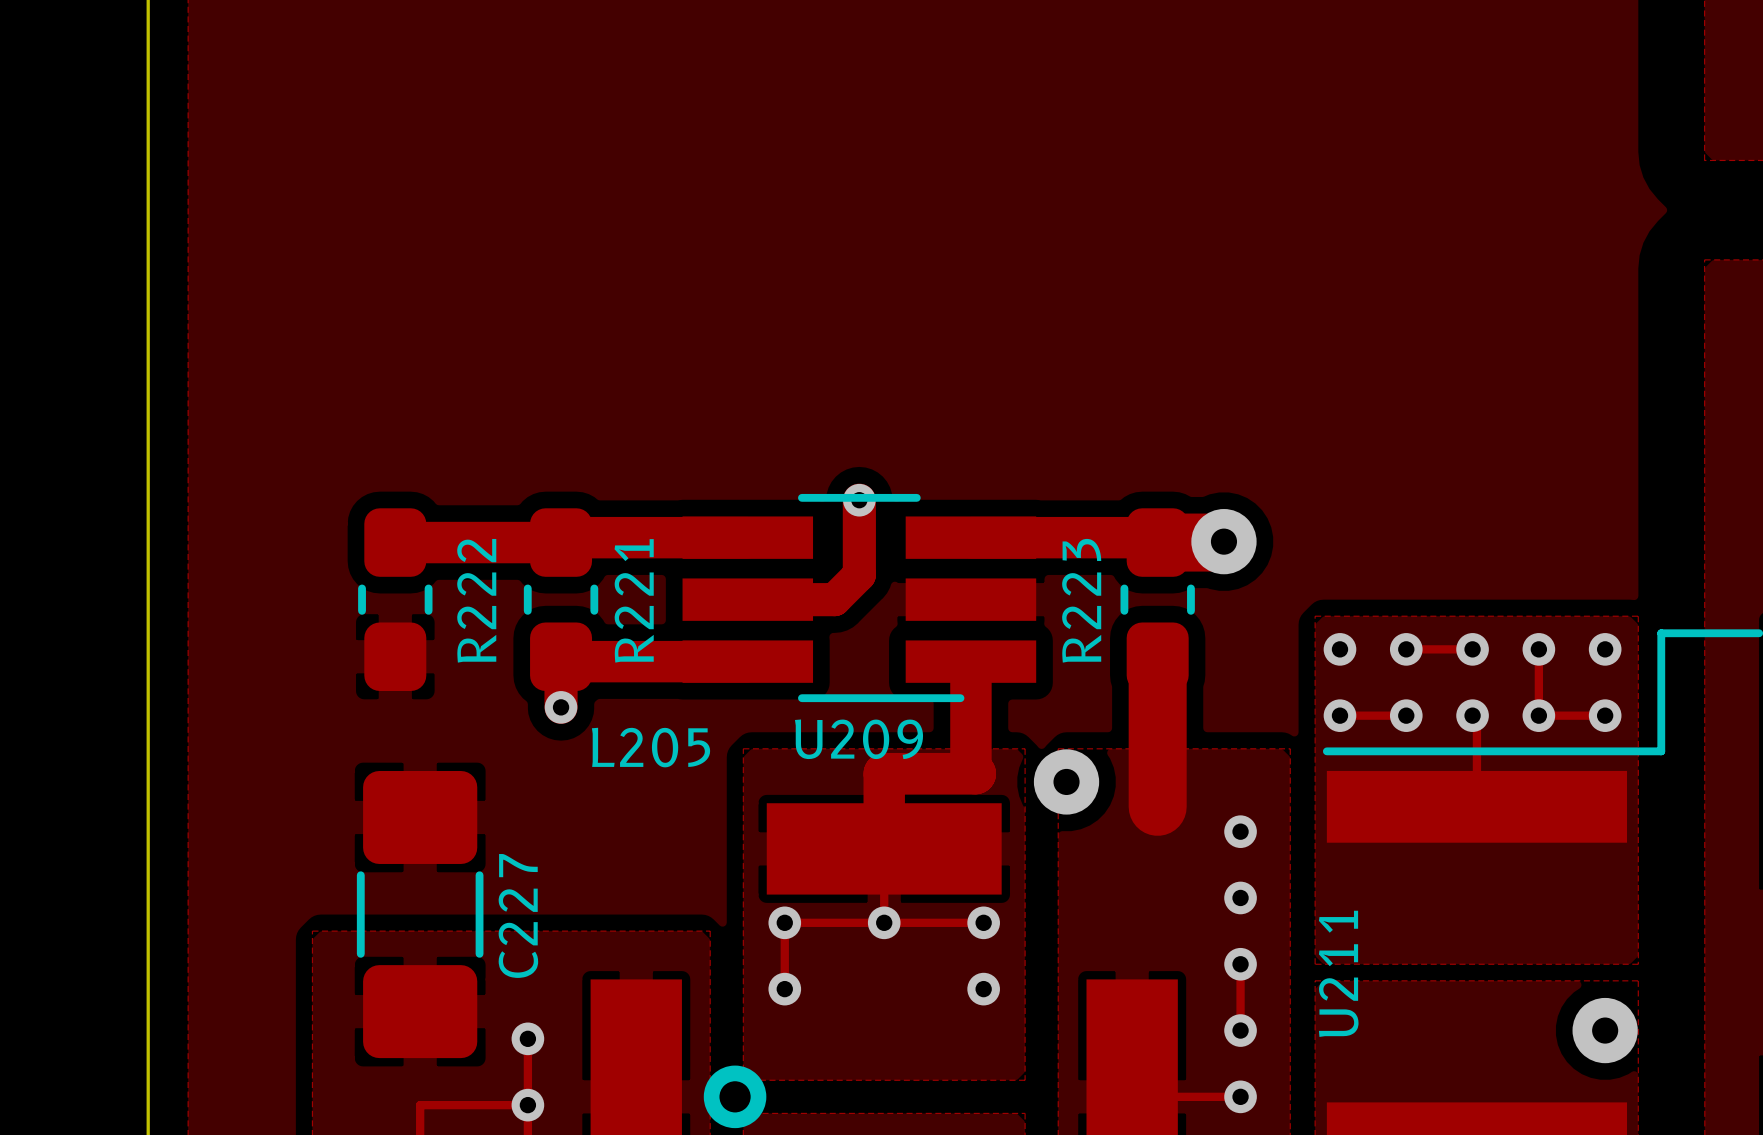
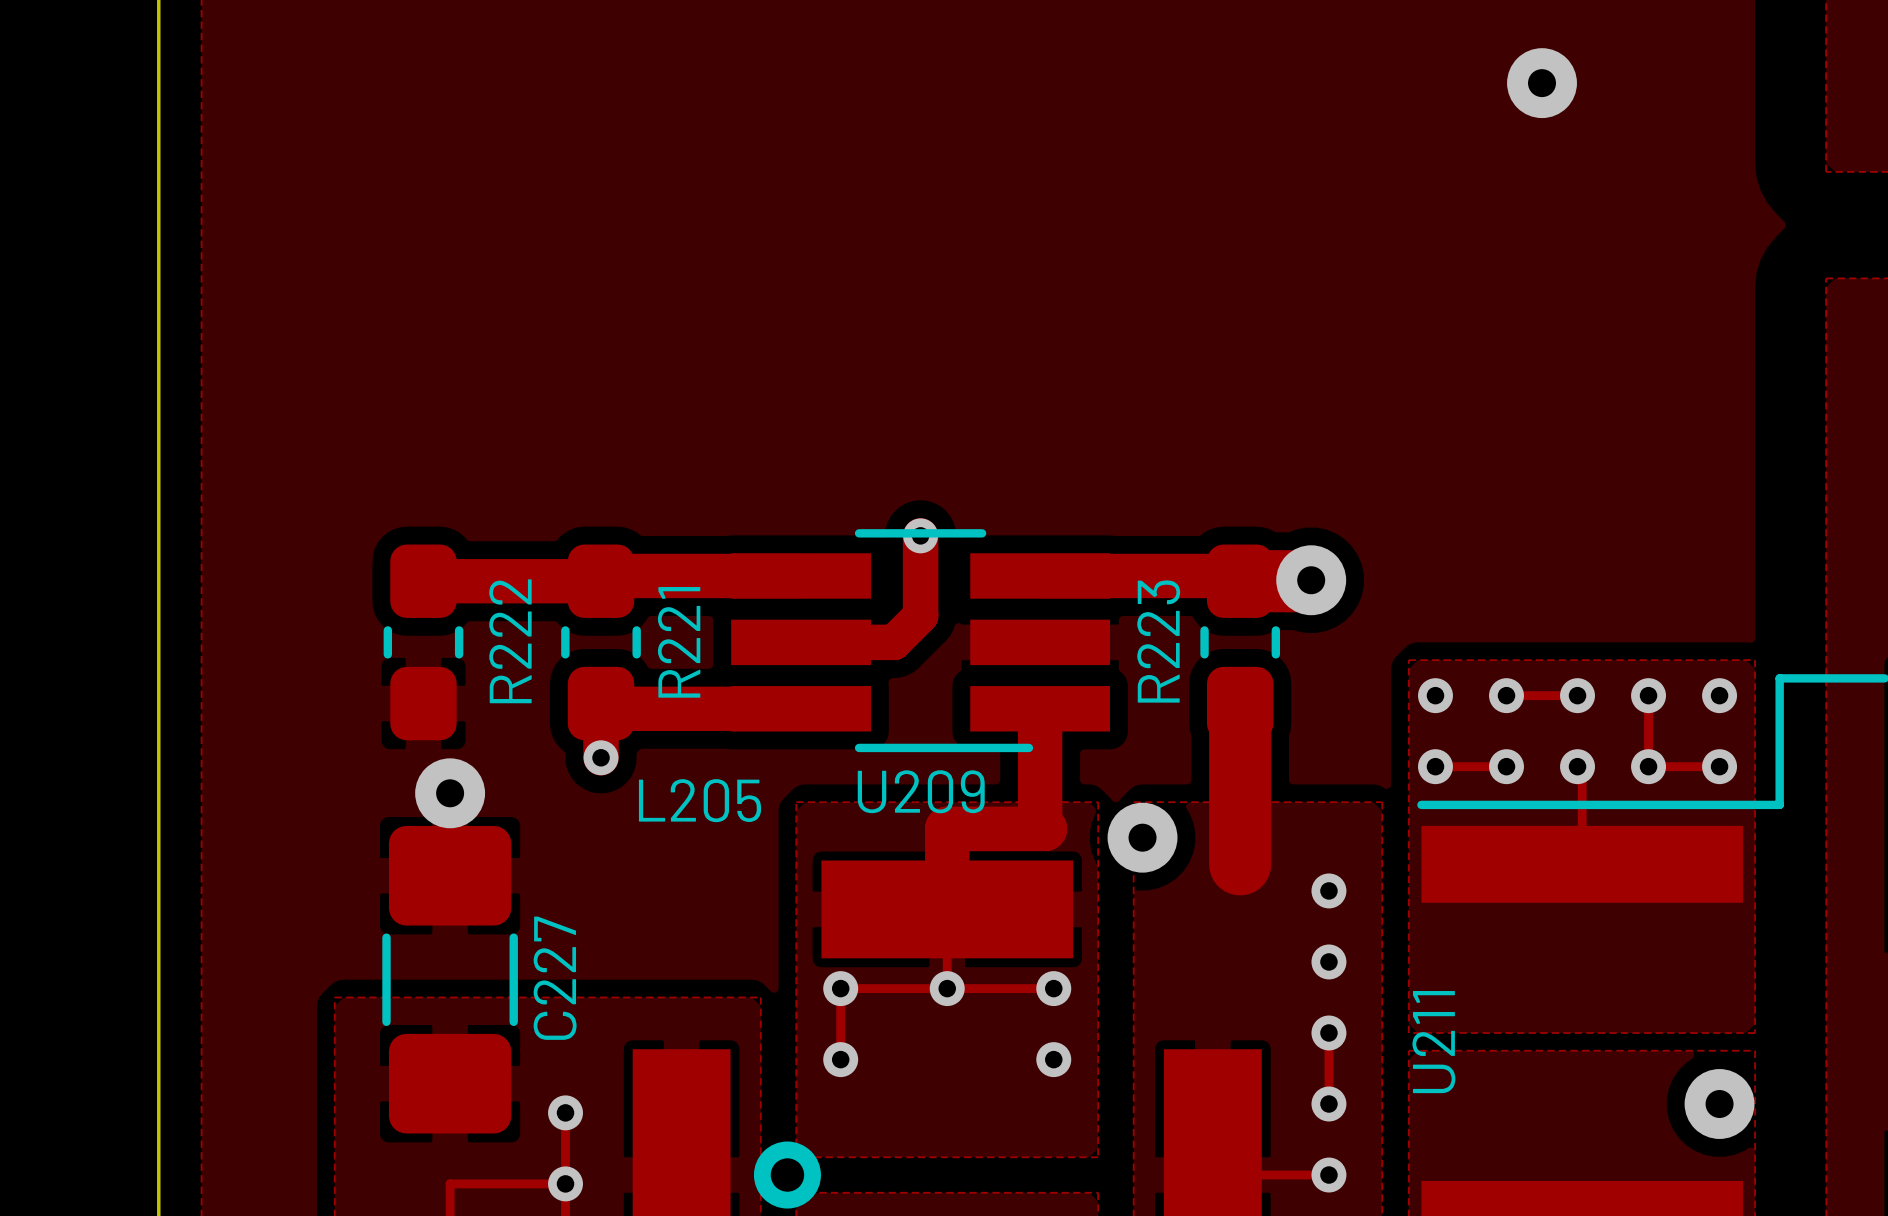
via: none -> (1542, 83)
via: none -> (450, 793)

